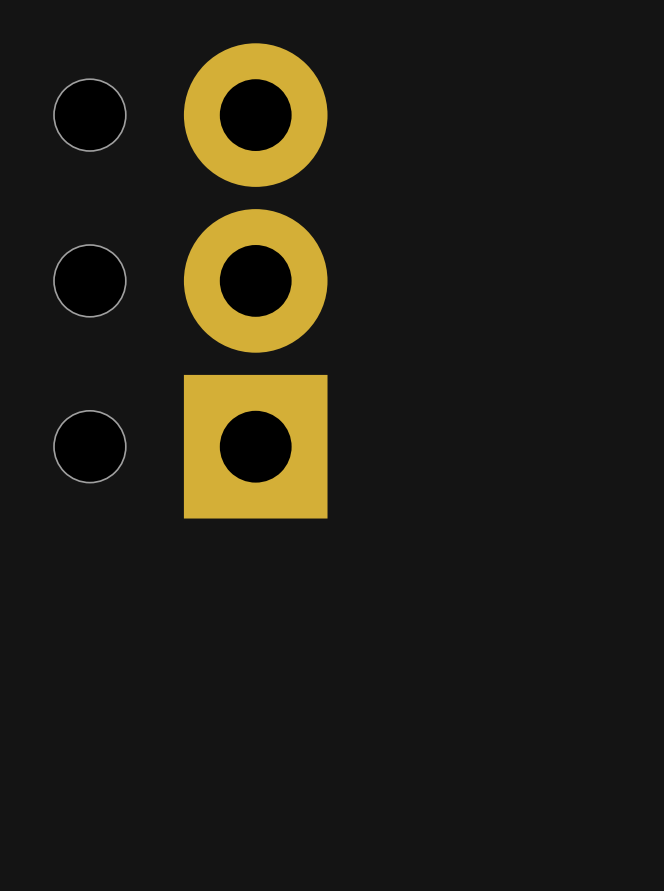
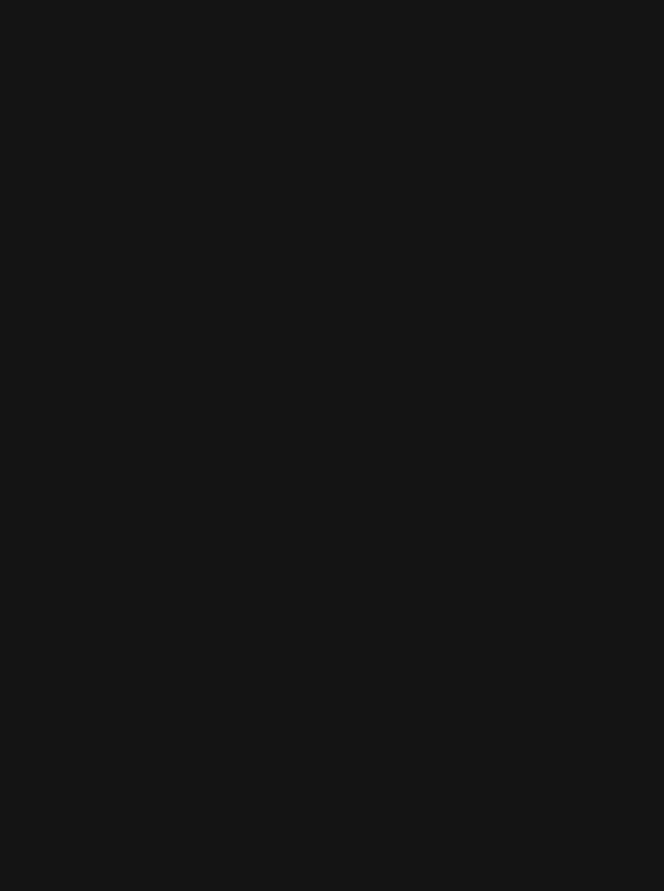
part: (190, 280) -> none

